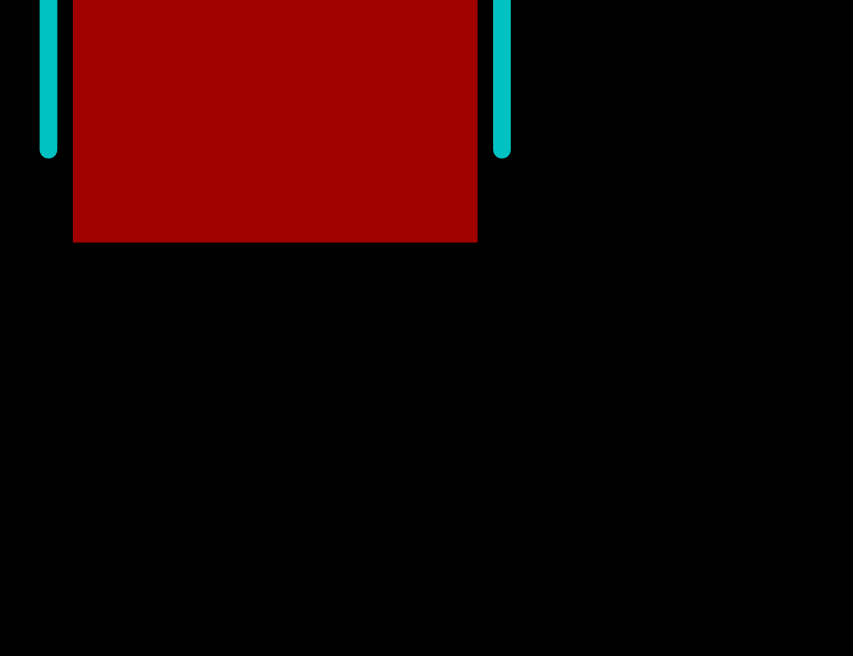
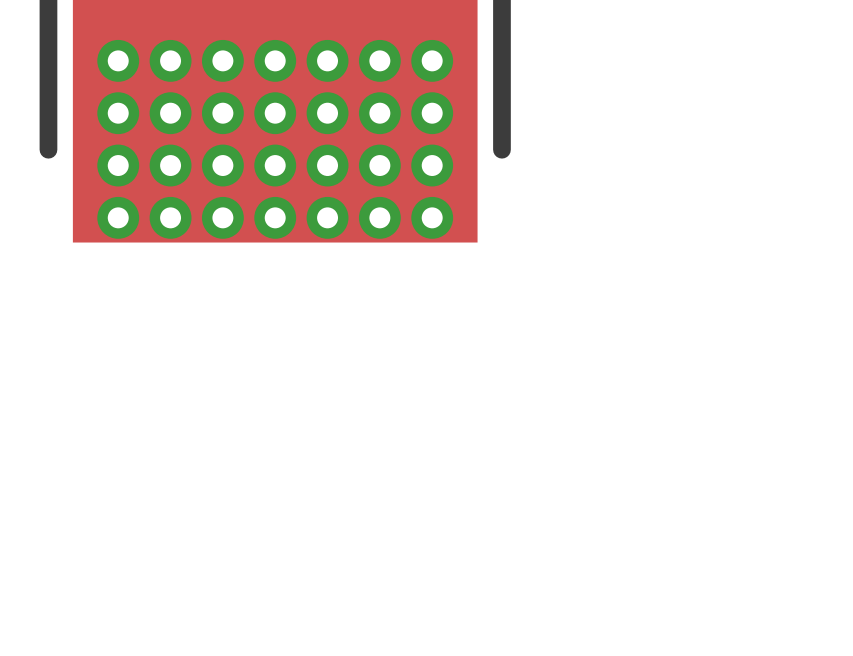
via: none -> (118, 60)
via: none -> (170, 60)
via: none -> (222, 60)
via: none -> (275, 60)
via: none -> (327, 60)
via: none -> (379, 60)
via: none -> (432, 60)
via: none -> (118, 113)
via: none -> (170, 113)
via: none -> (222, 113)
via: none -> (275, 113)
via: none -> (327, 113)
via: none -> (379, 113)
via: none -> (432, 113)
via: none -> (118, 165)
via: none -> (170, 165)
via: none -> (222, 165)
via: none -> (275, 165)
via: none -> (327, 165)
via: none -> (379, 165)
via: none -> (432, 165)
via: none -> (118, 217)
via: none -> (170, 217)
via: none -> (222, 217)
via: none -> (275, 217)
via: none -> (327, 217)
via: none -> (379, 217)
via: none -> (432, 217)

